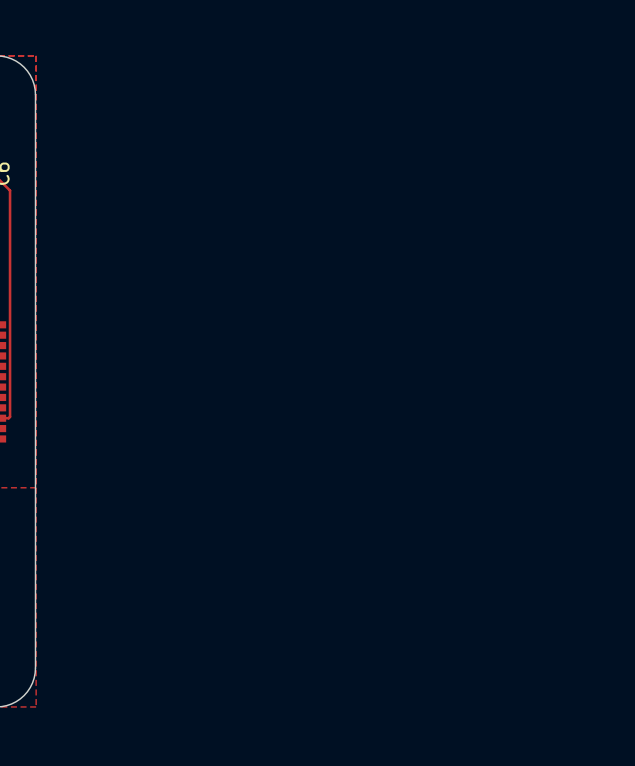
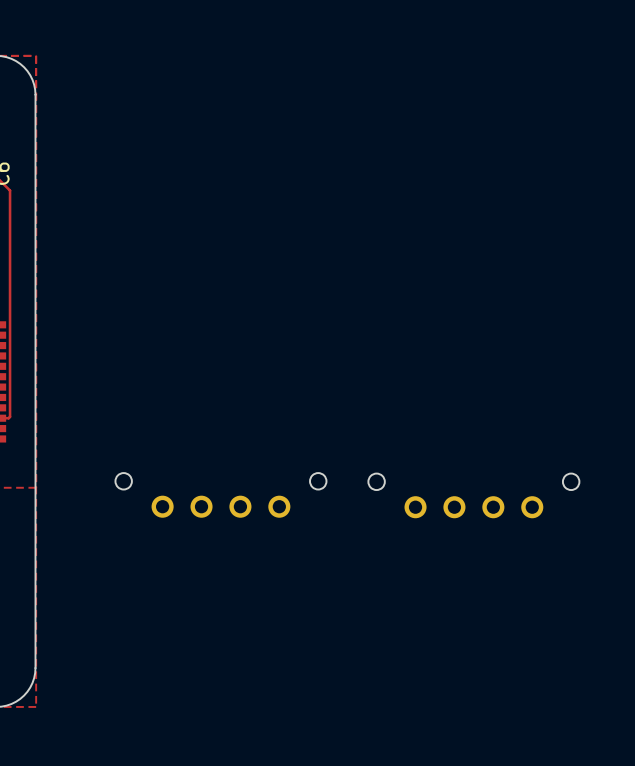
part: none -> (220, 495)
part: none -> (473, 495)

